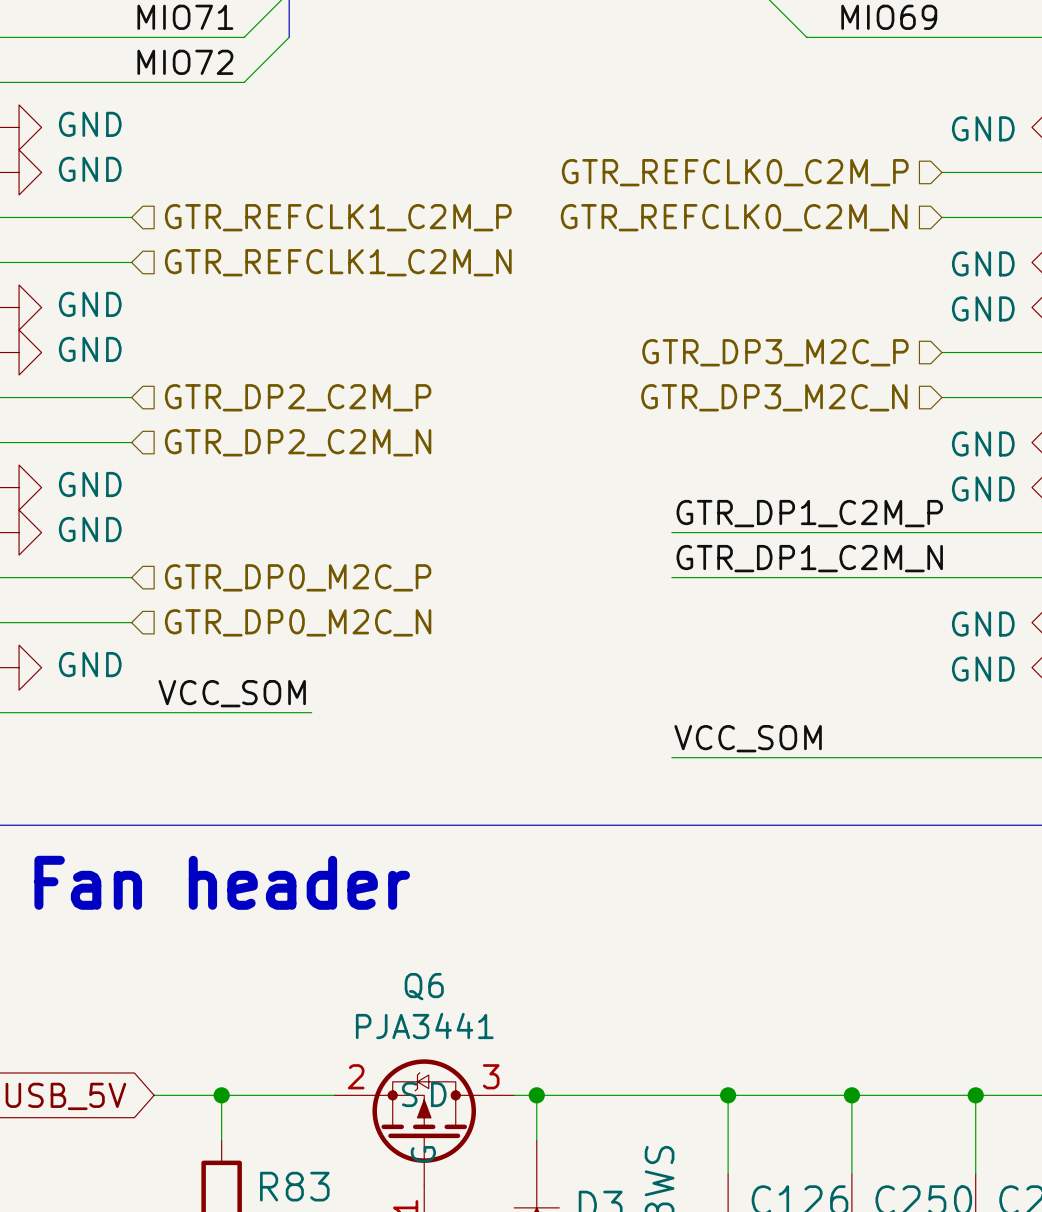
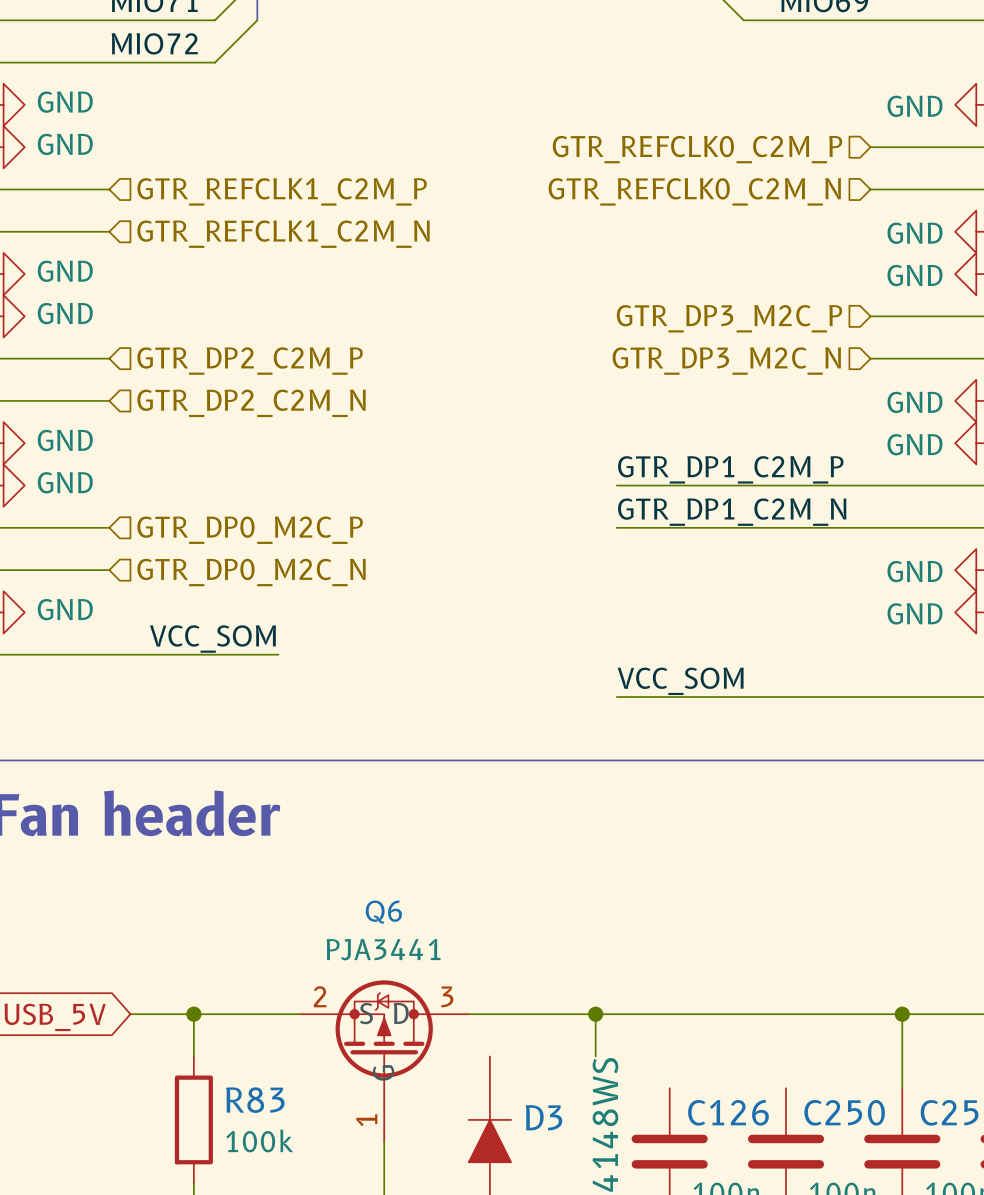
wire: (536, 1095) (536, 1140) -> (595, 1014) (595, 1056)
junction: (536, 1095) -> none
junction: none -> (595, 1014)
wire: (728, 1095) (728, 1174) -> none
junction: (728, 1095) -> none
wire: (851, 1095) (851, 1174) -> none
junction: (851, 1095) -> none

